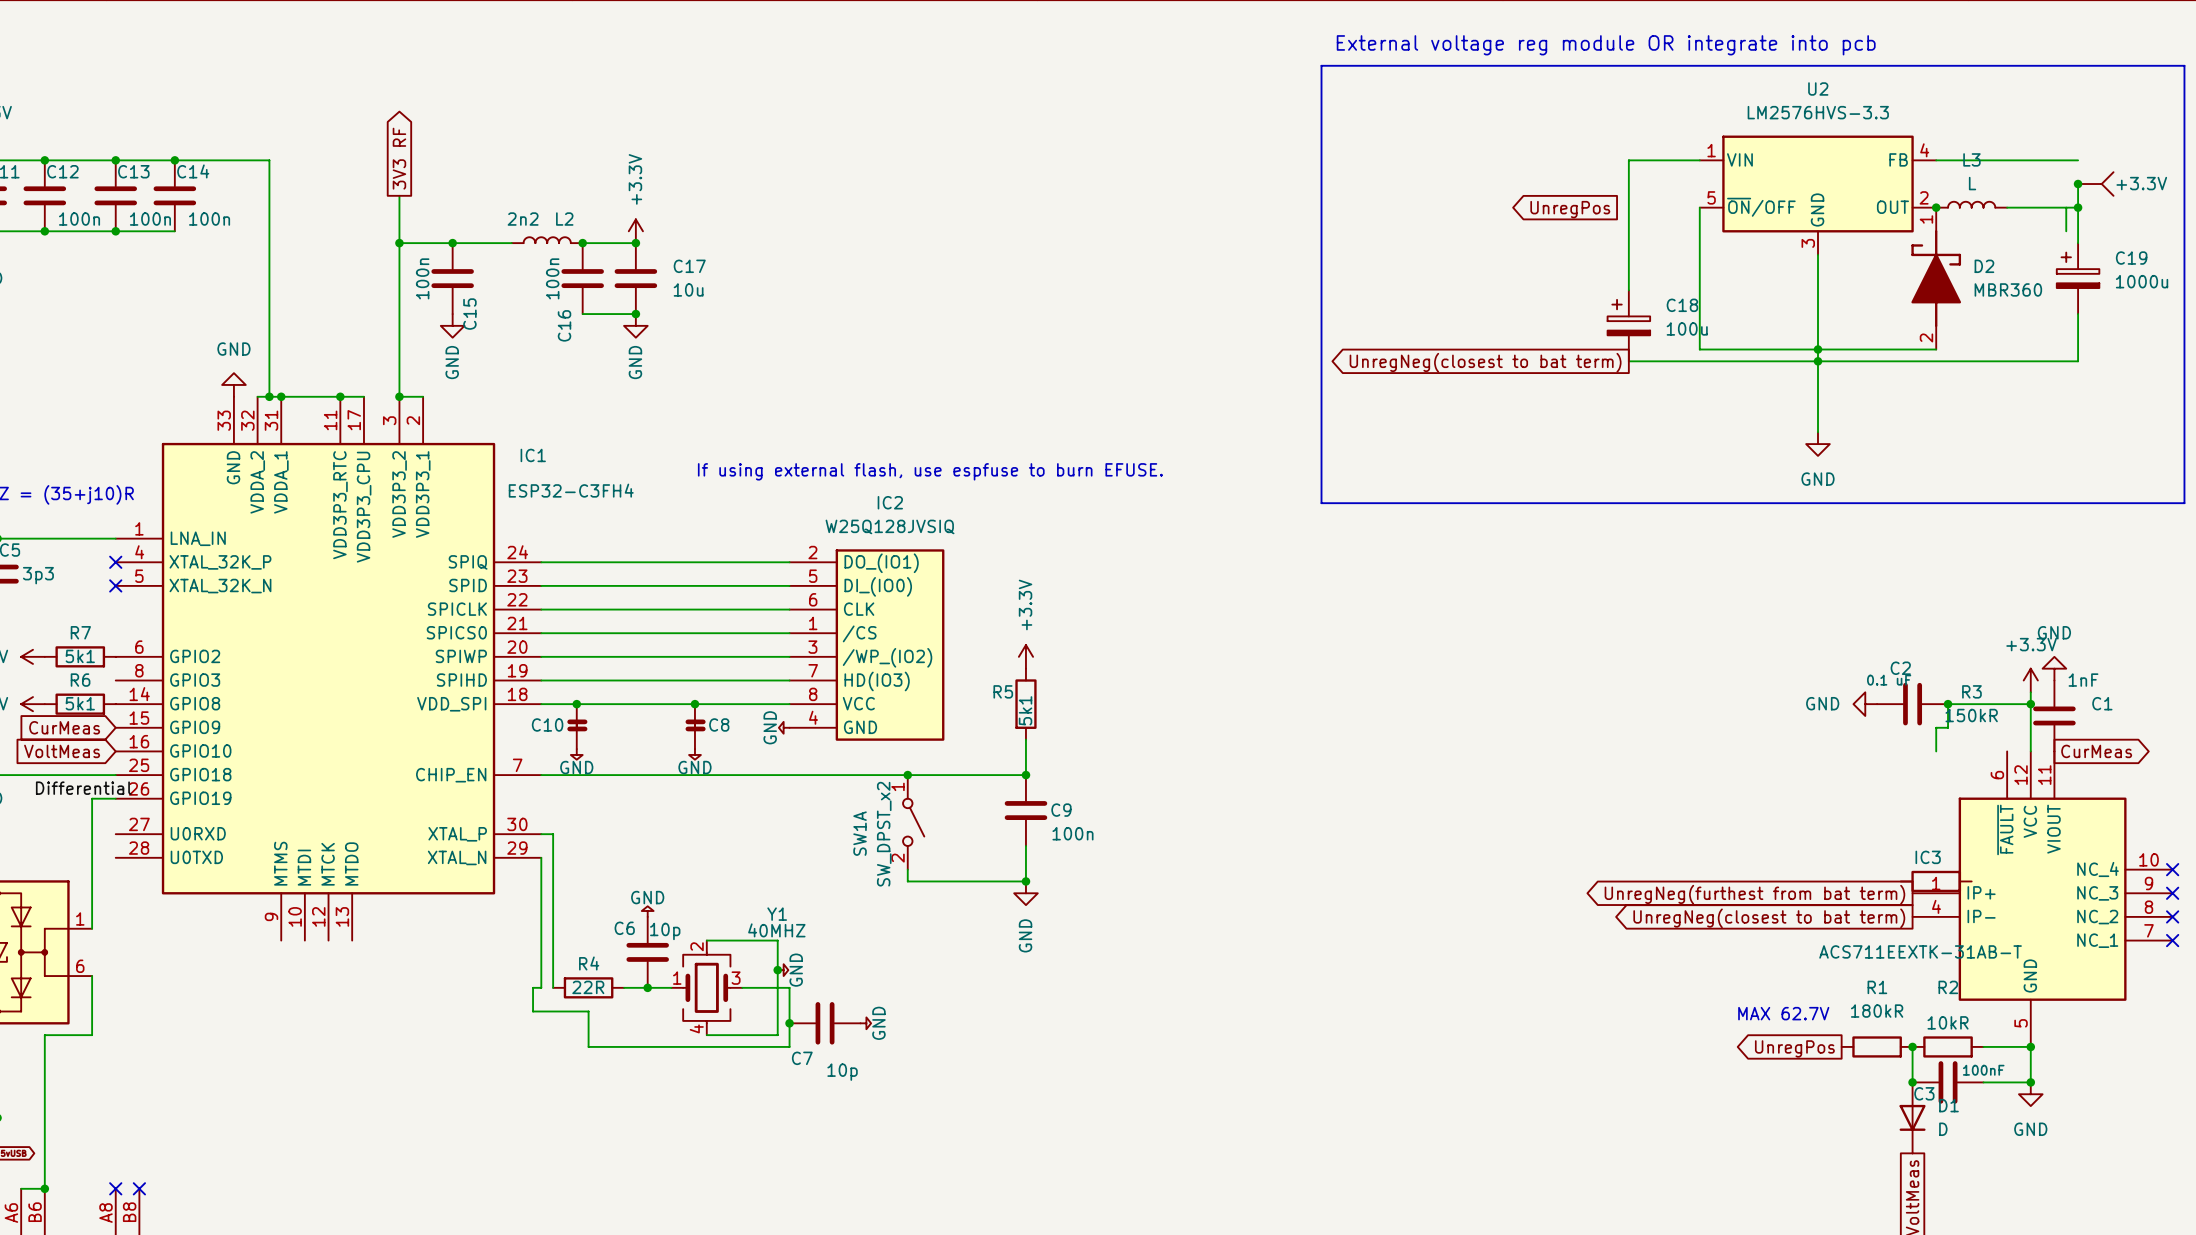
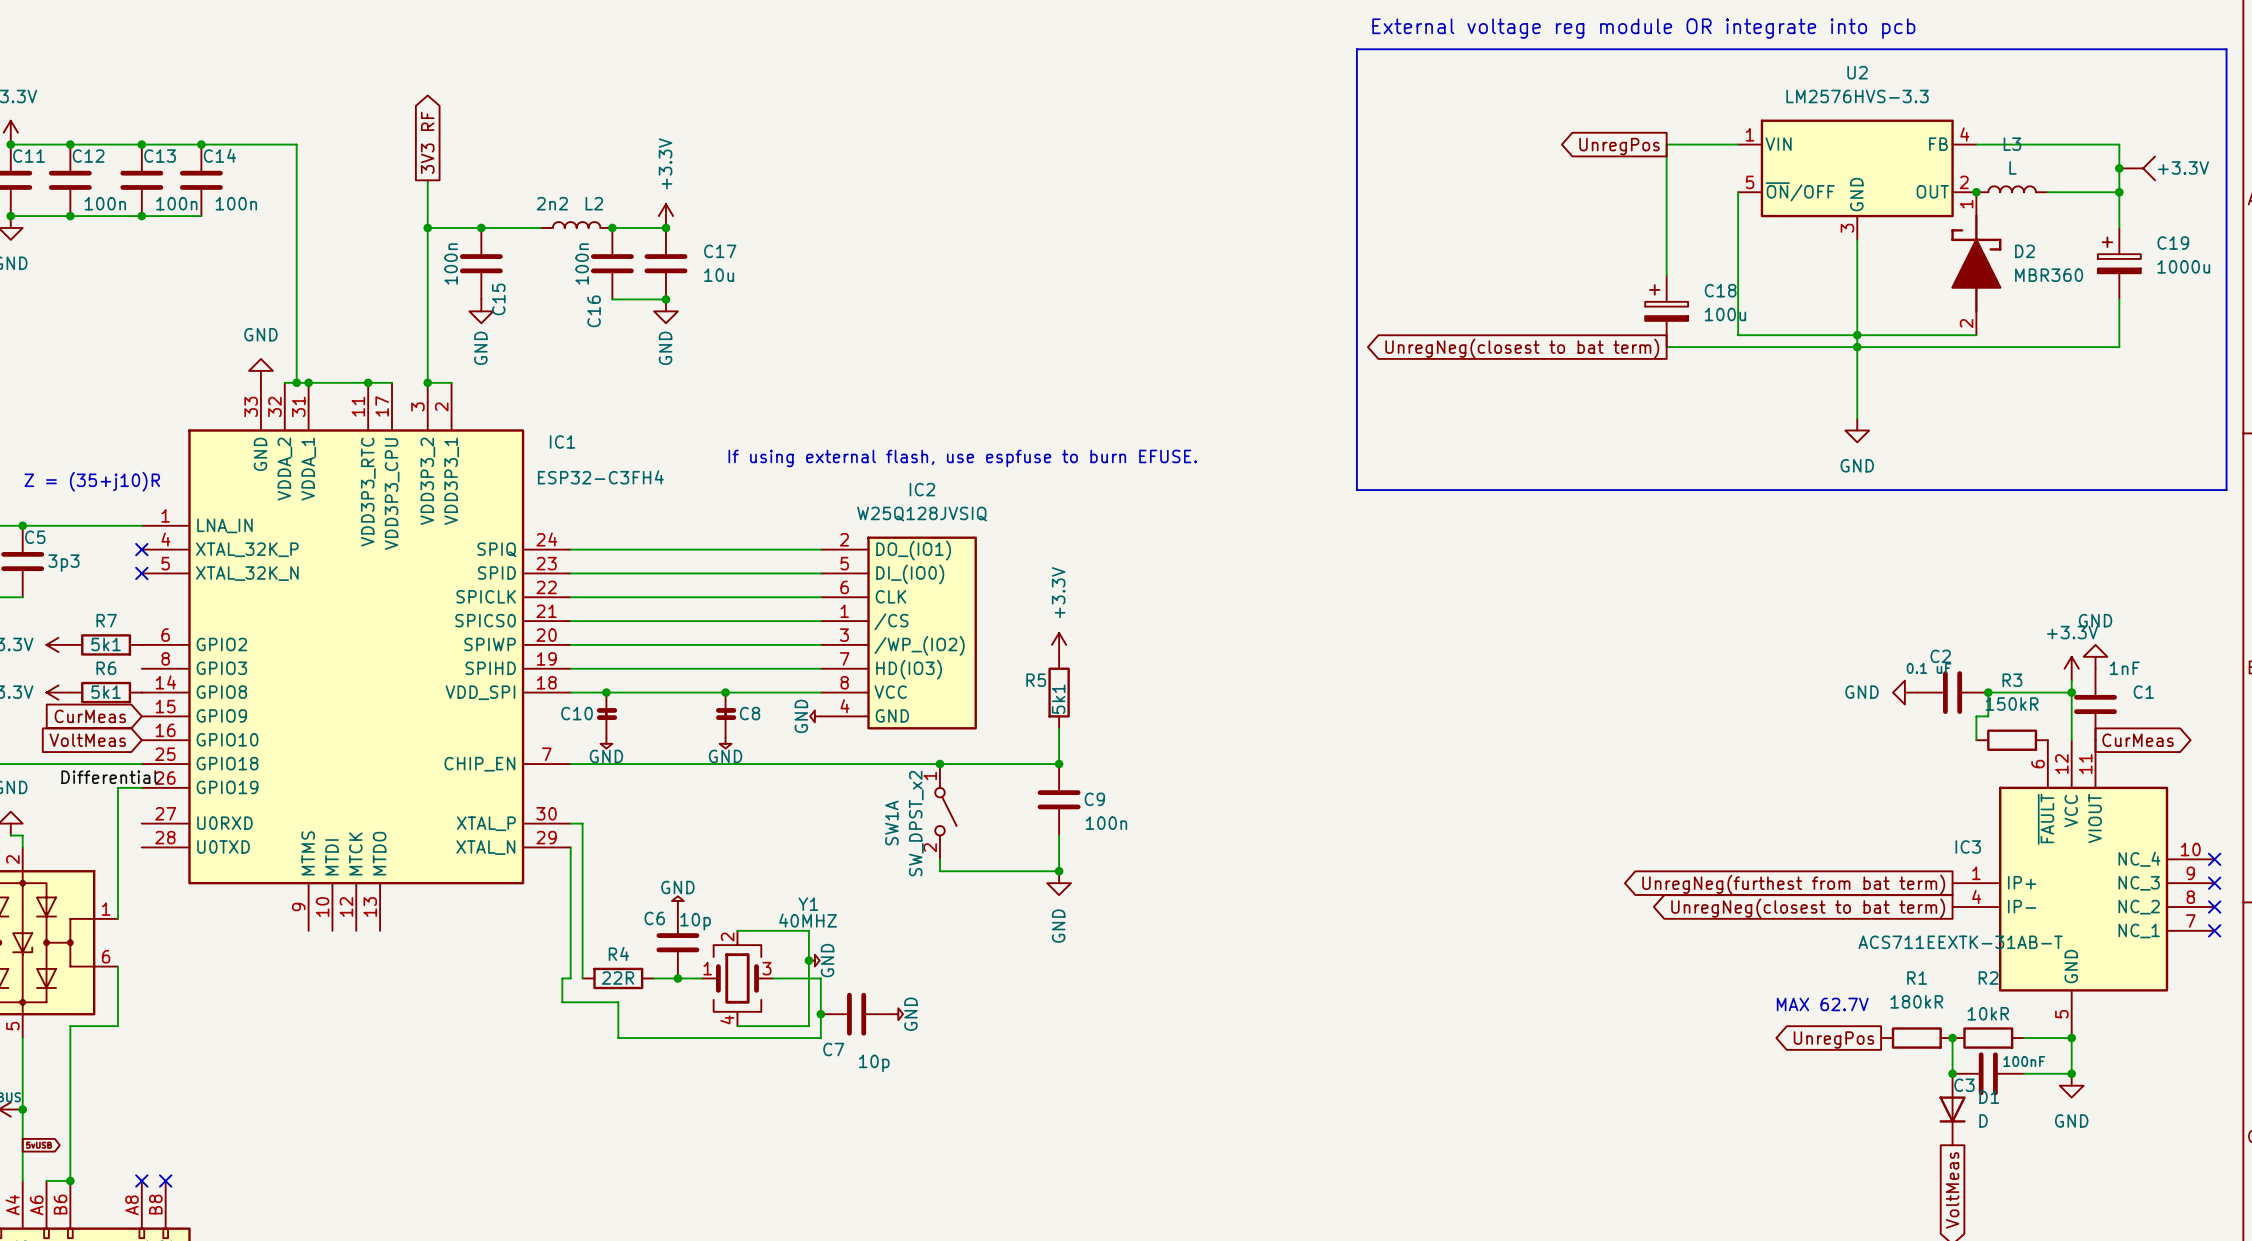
wire: (2066, 207) (2066, 231) -> (2119, 144) (2119, 168)
global label position: UnregPos (1570, 209) -> UnregPos (1619, 146)
R3 position: (1936, 881) -> (2012, 740)

